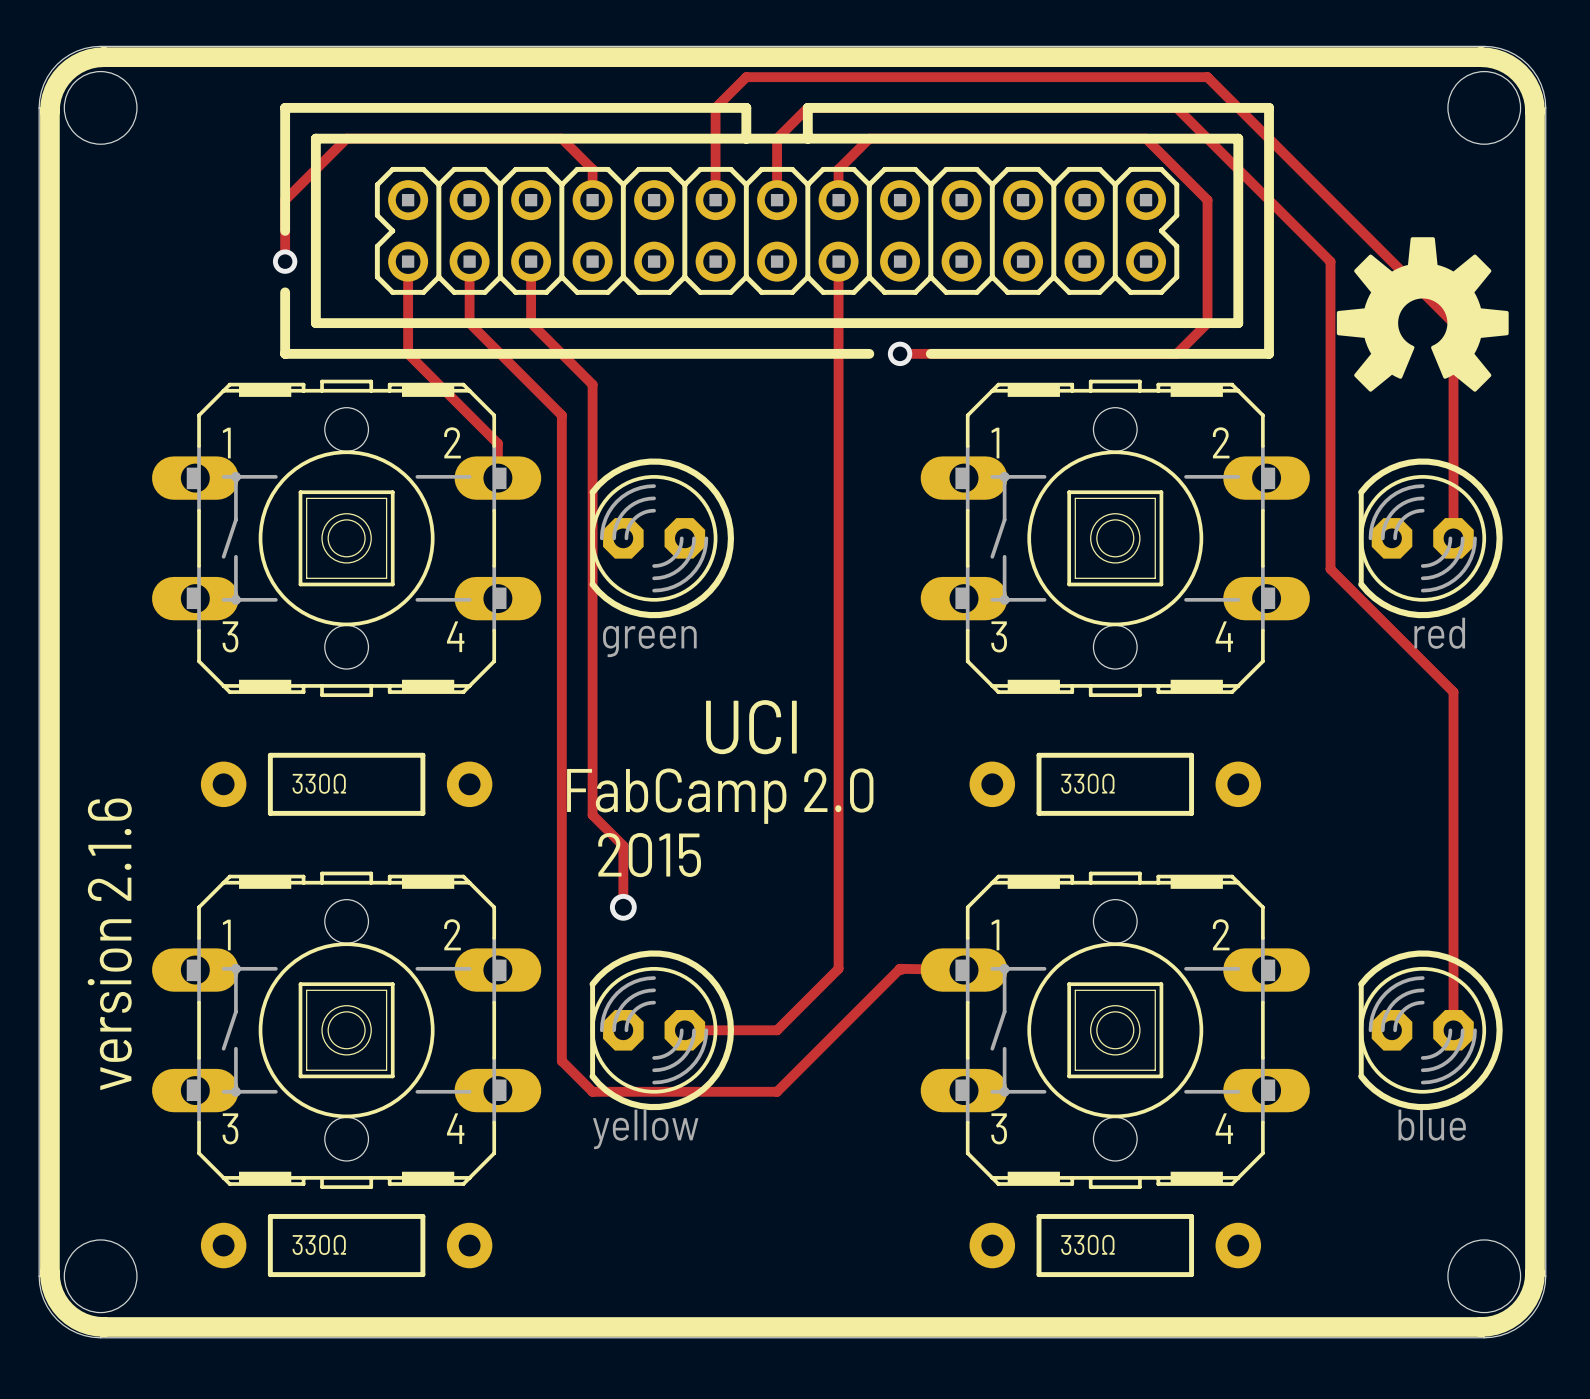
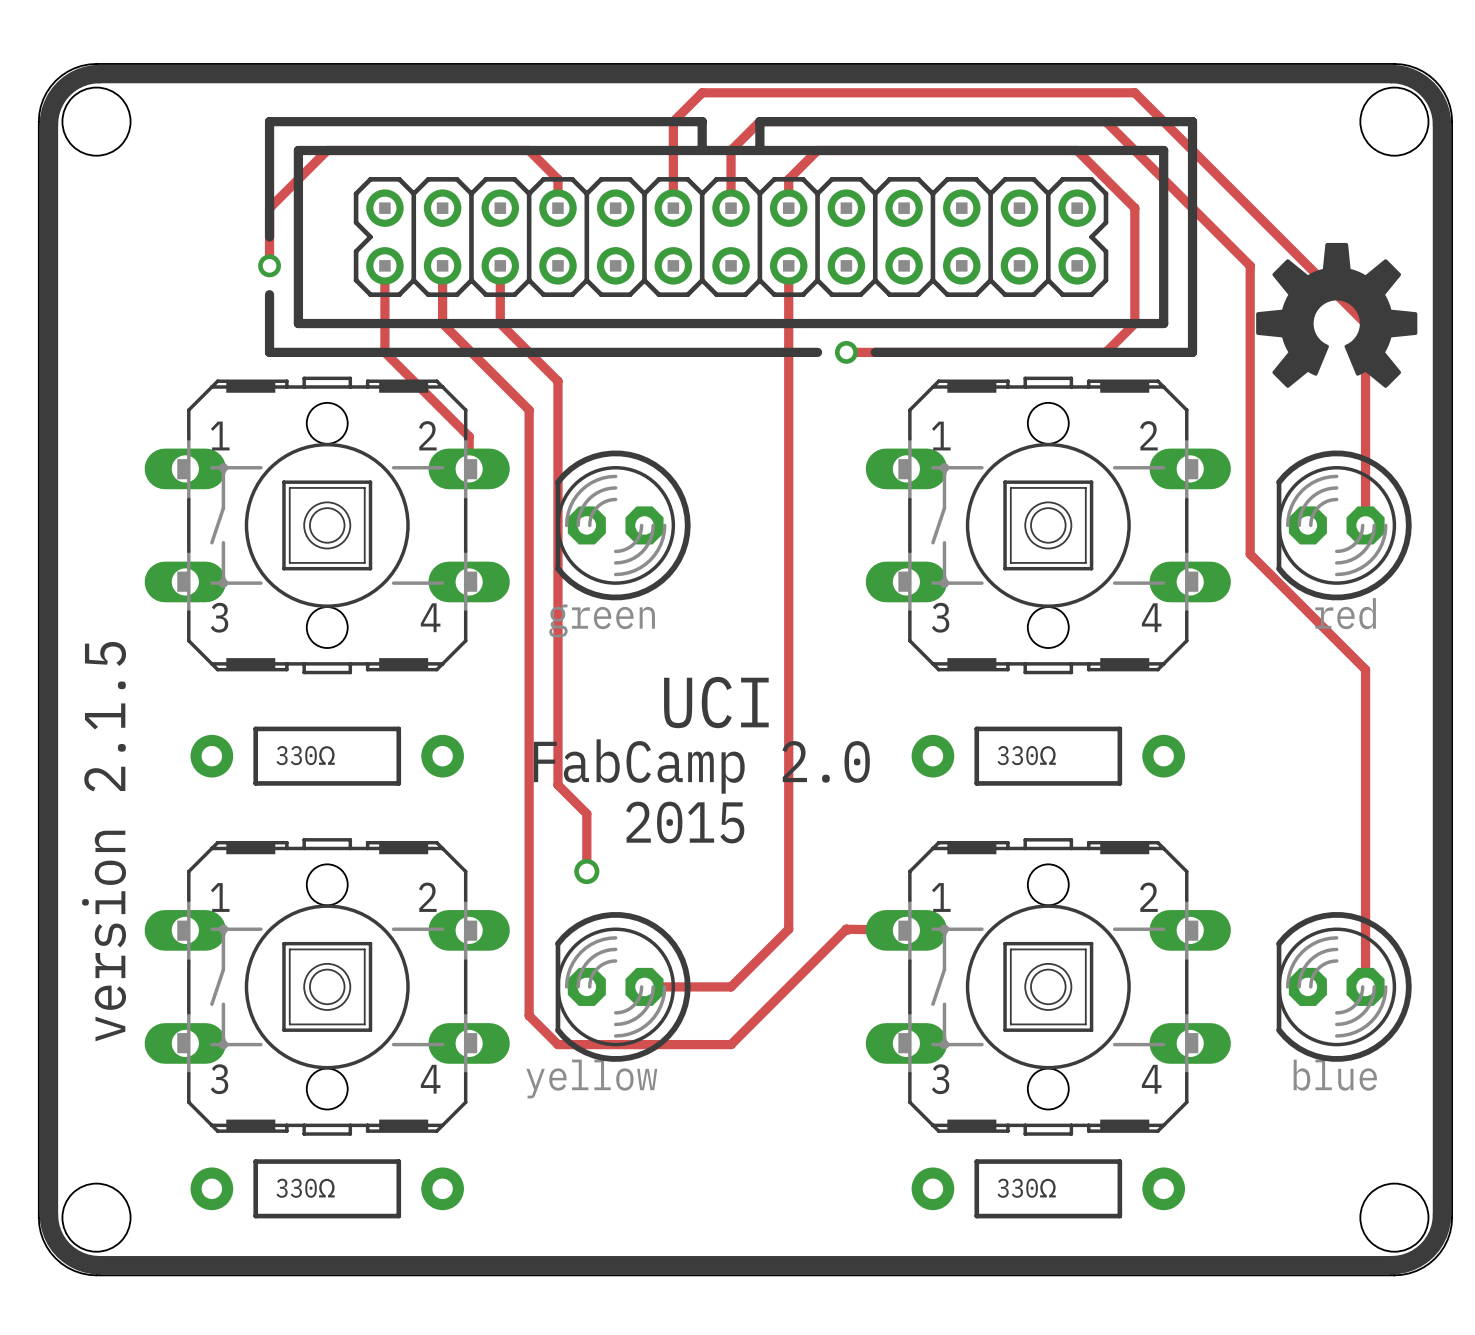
text: version 2.1.6 (109, 944) -> version 2.1.5 (104, 841)

